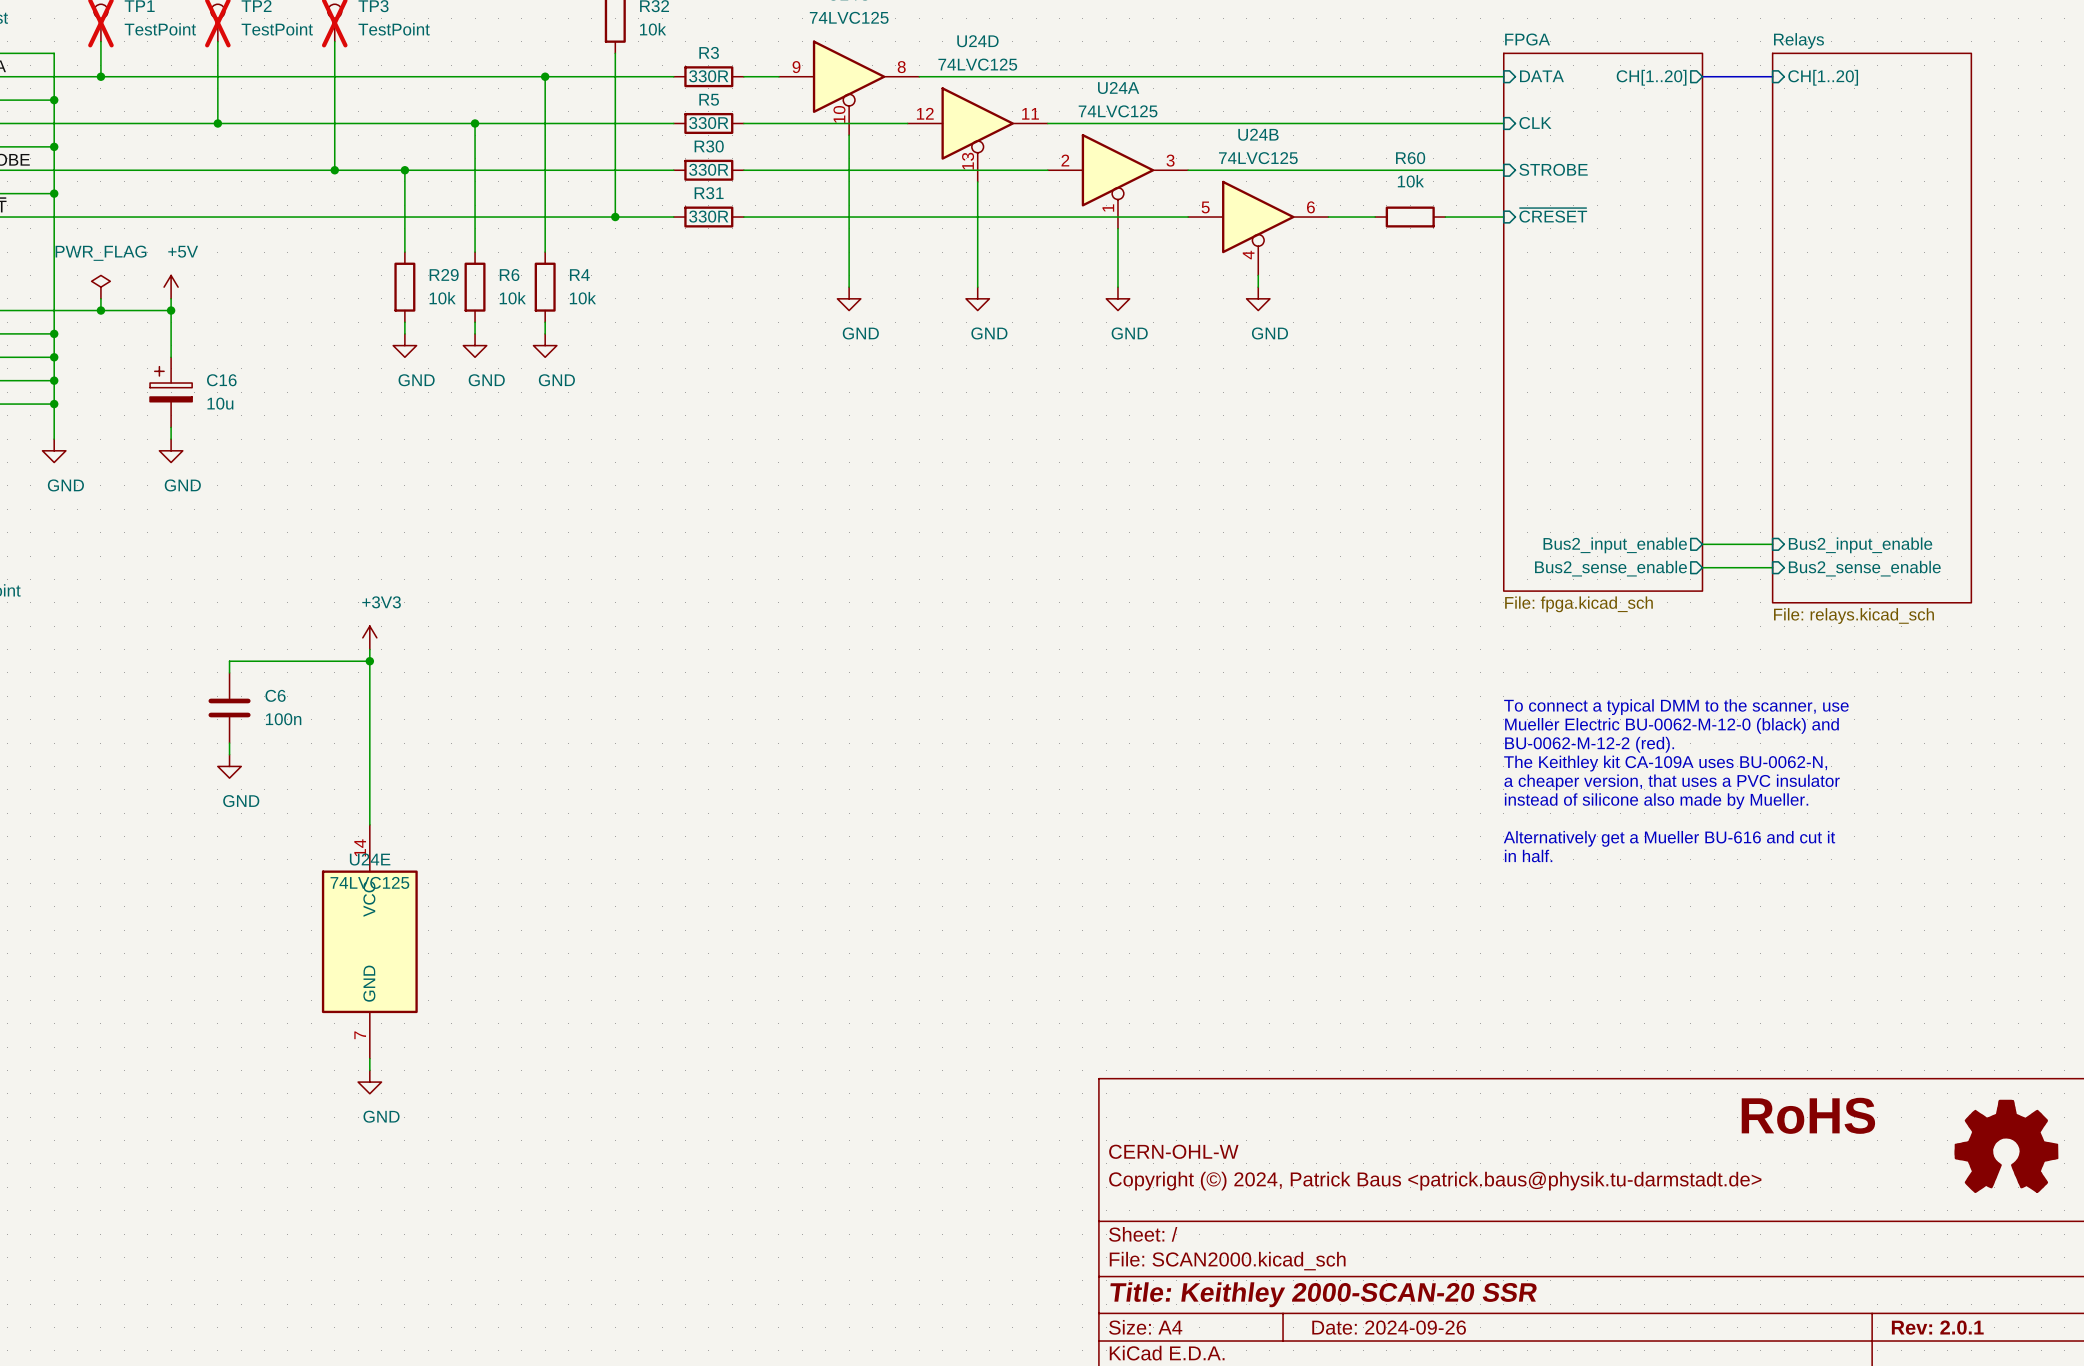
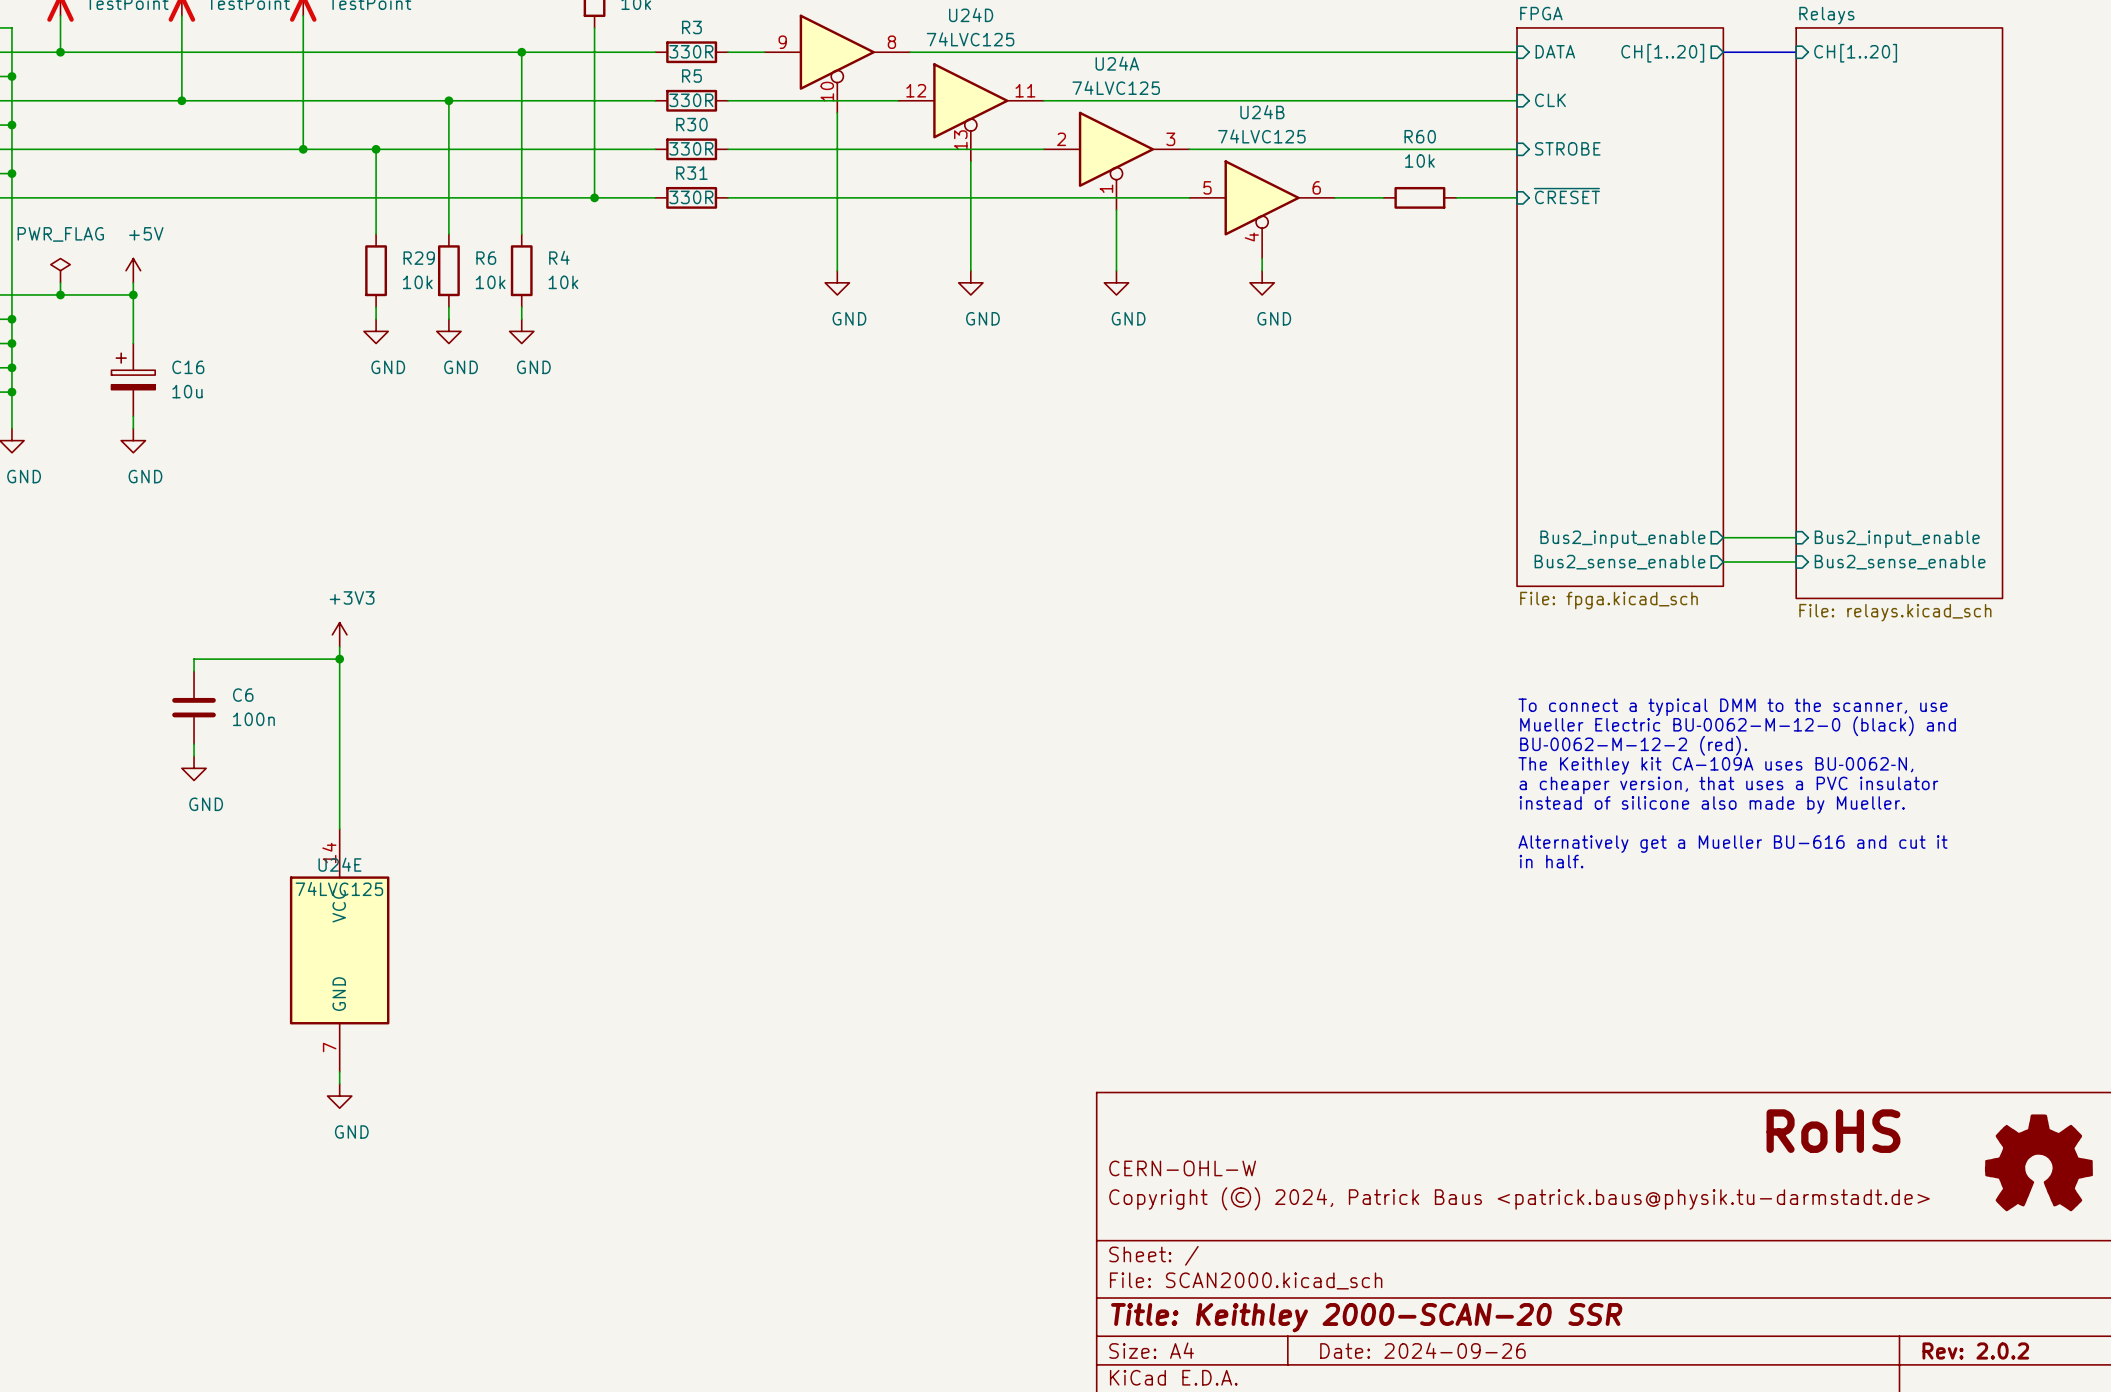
title block: Rev: 2.0.1 (1937, 1327) -> Rev: 2.0.2 (1975, 1350)

